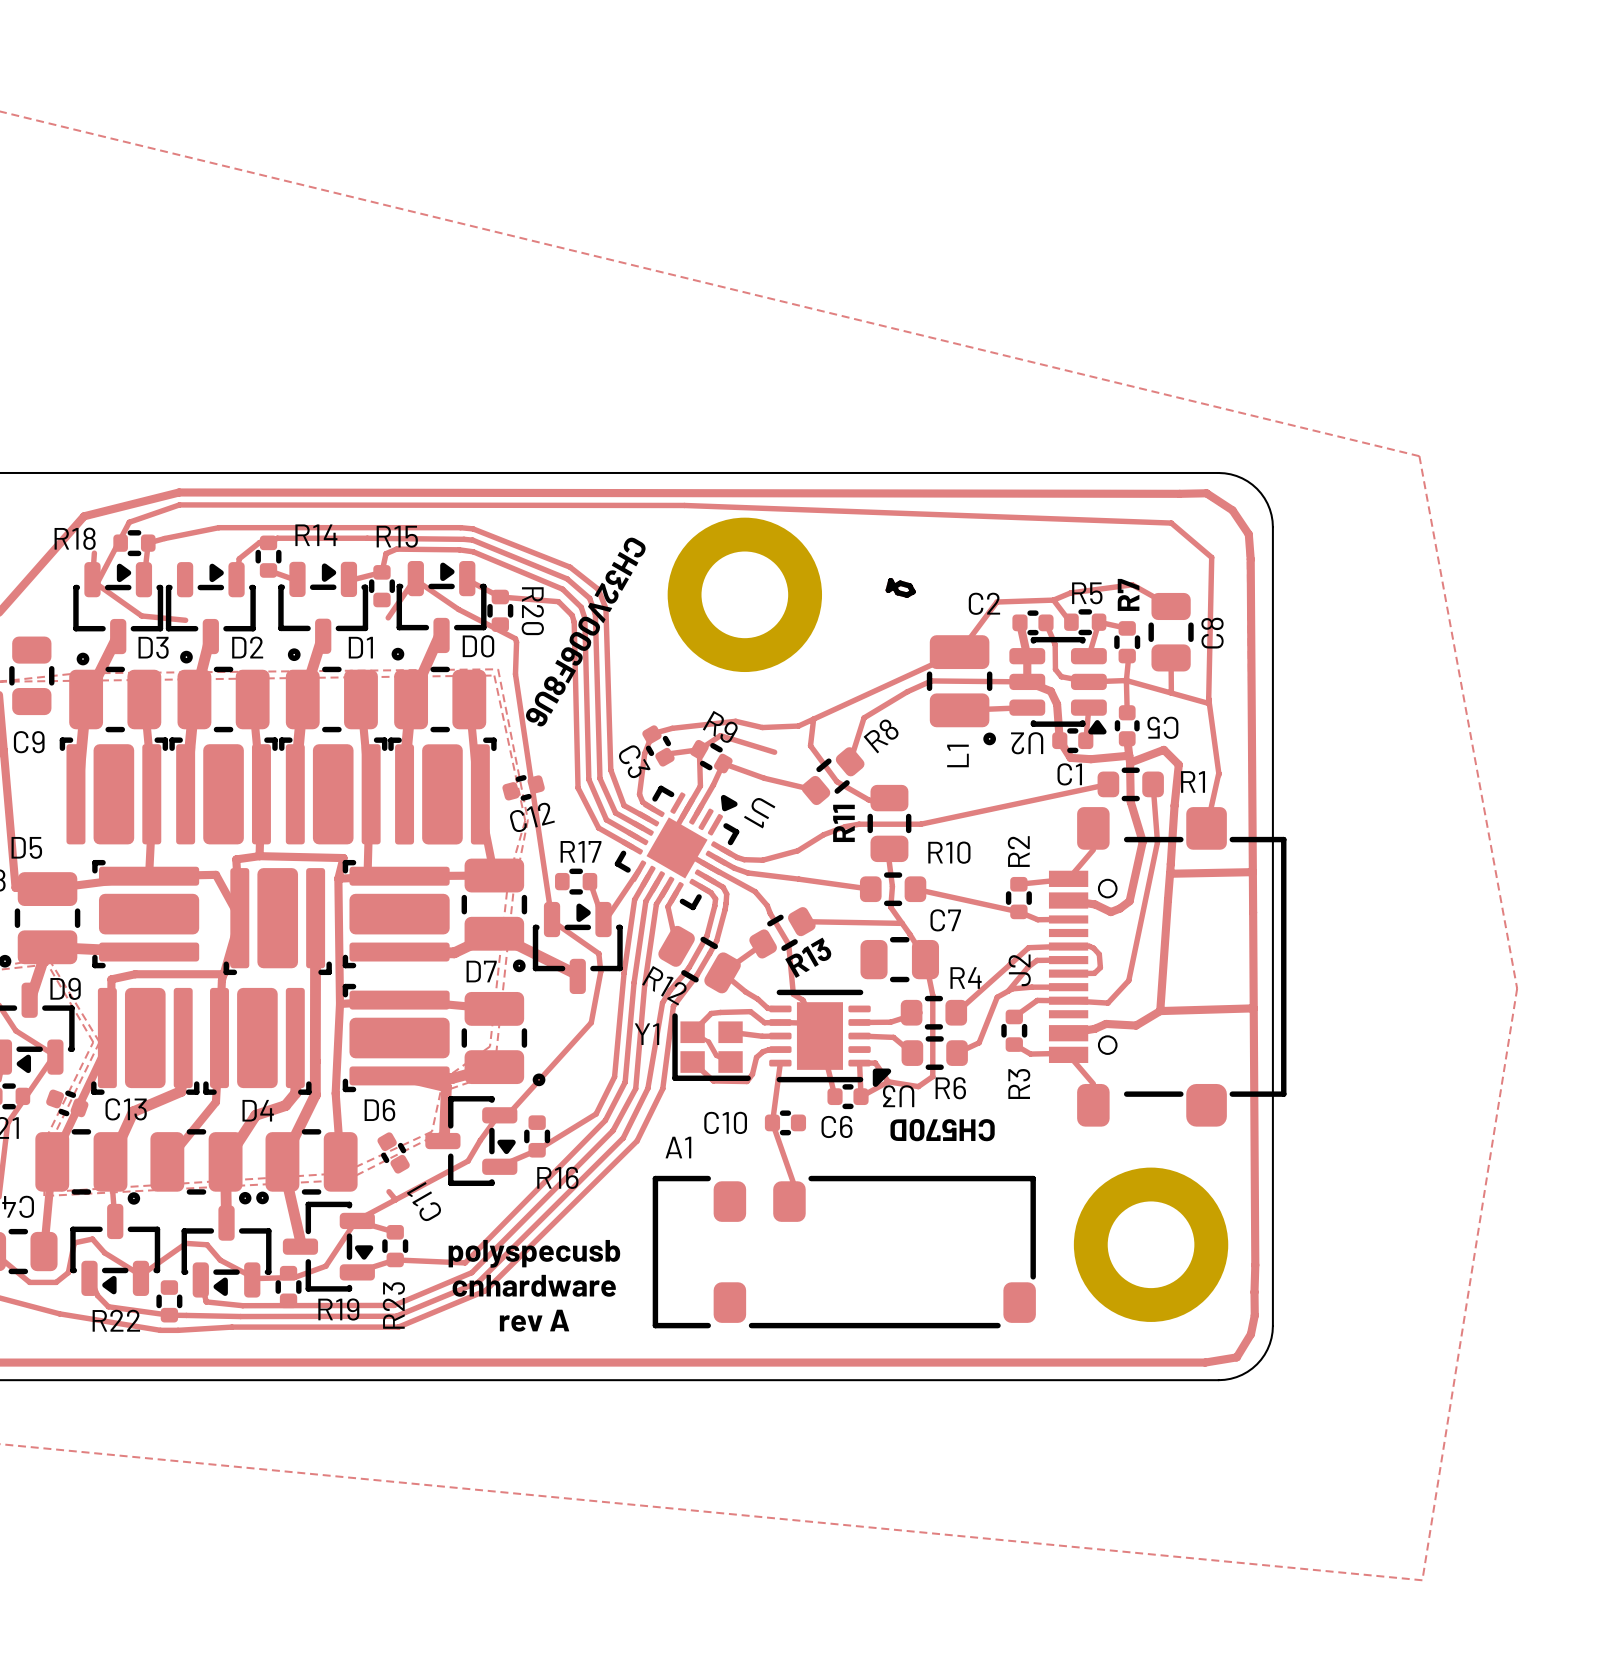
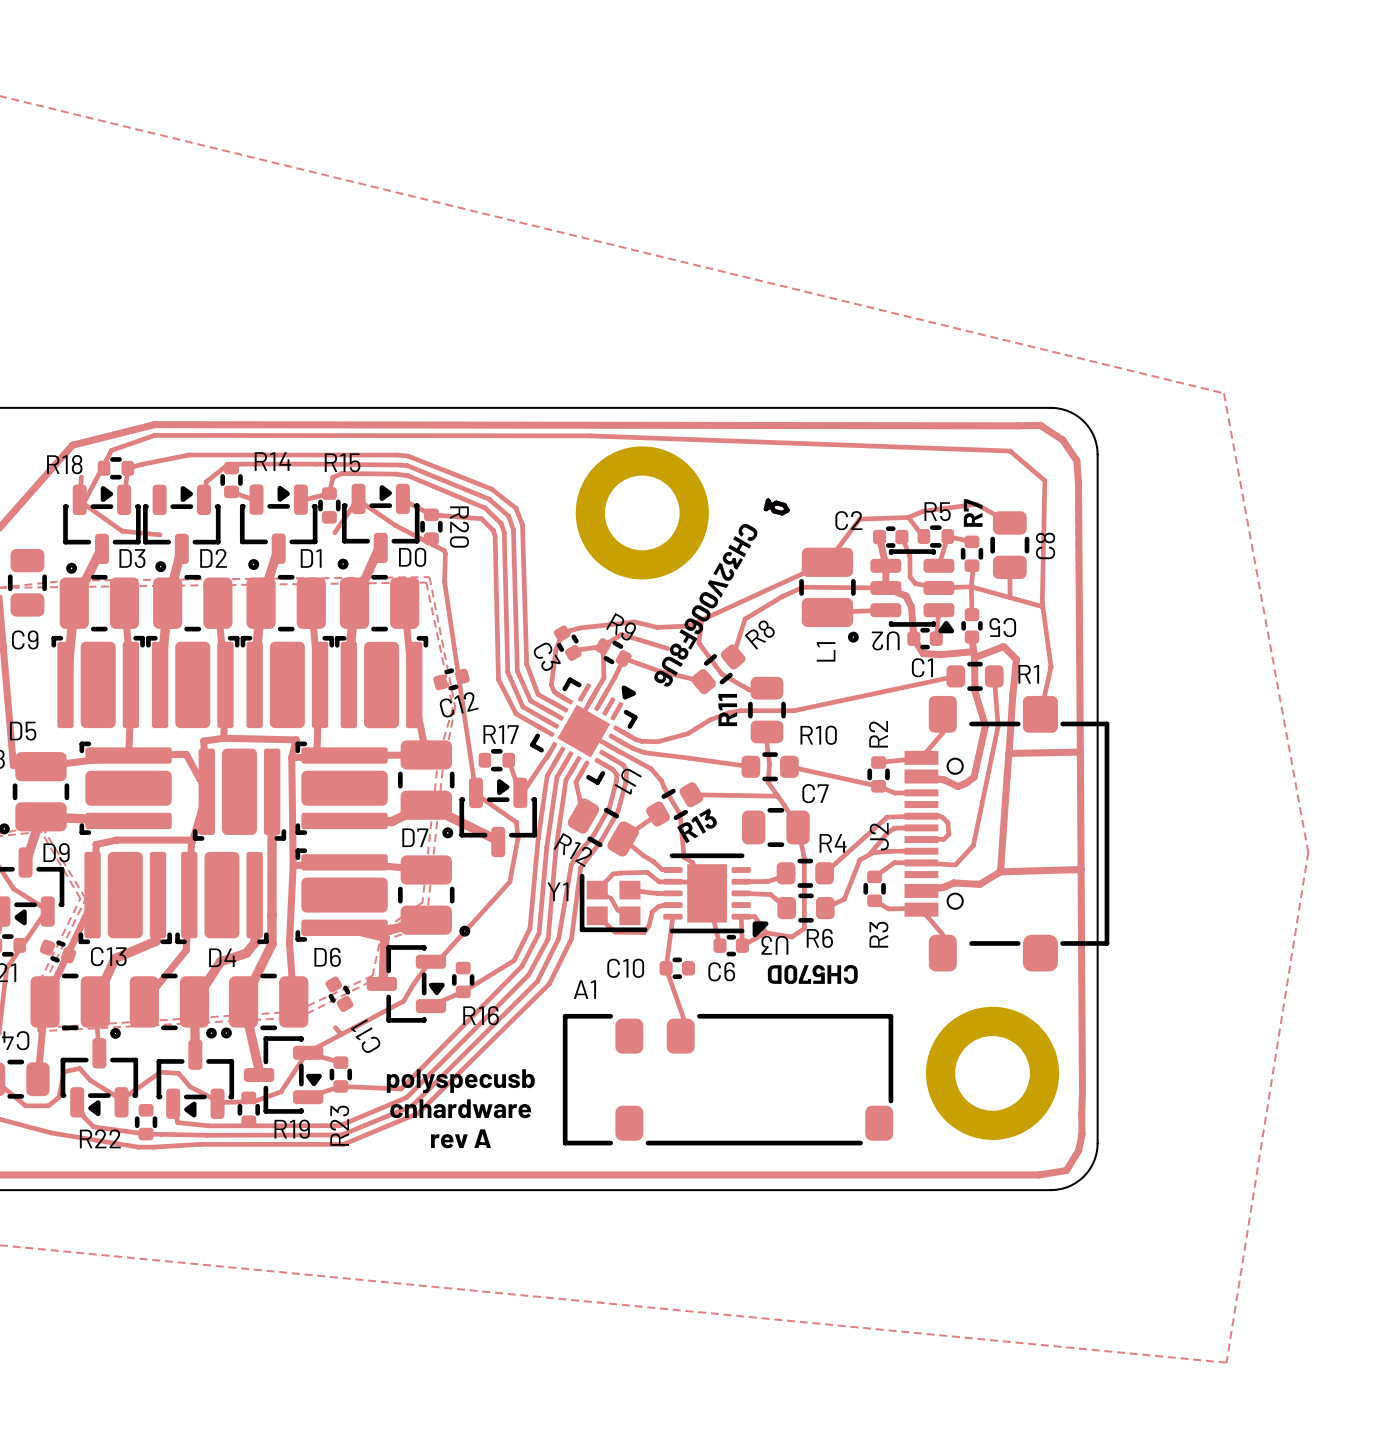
text position: CH32V006F8U6 (585, 632) -> CH32V006F8U6 (705, 605)
U1 name position: U1 (759, 813) -> U1 (628, 781)

